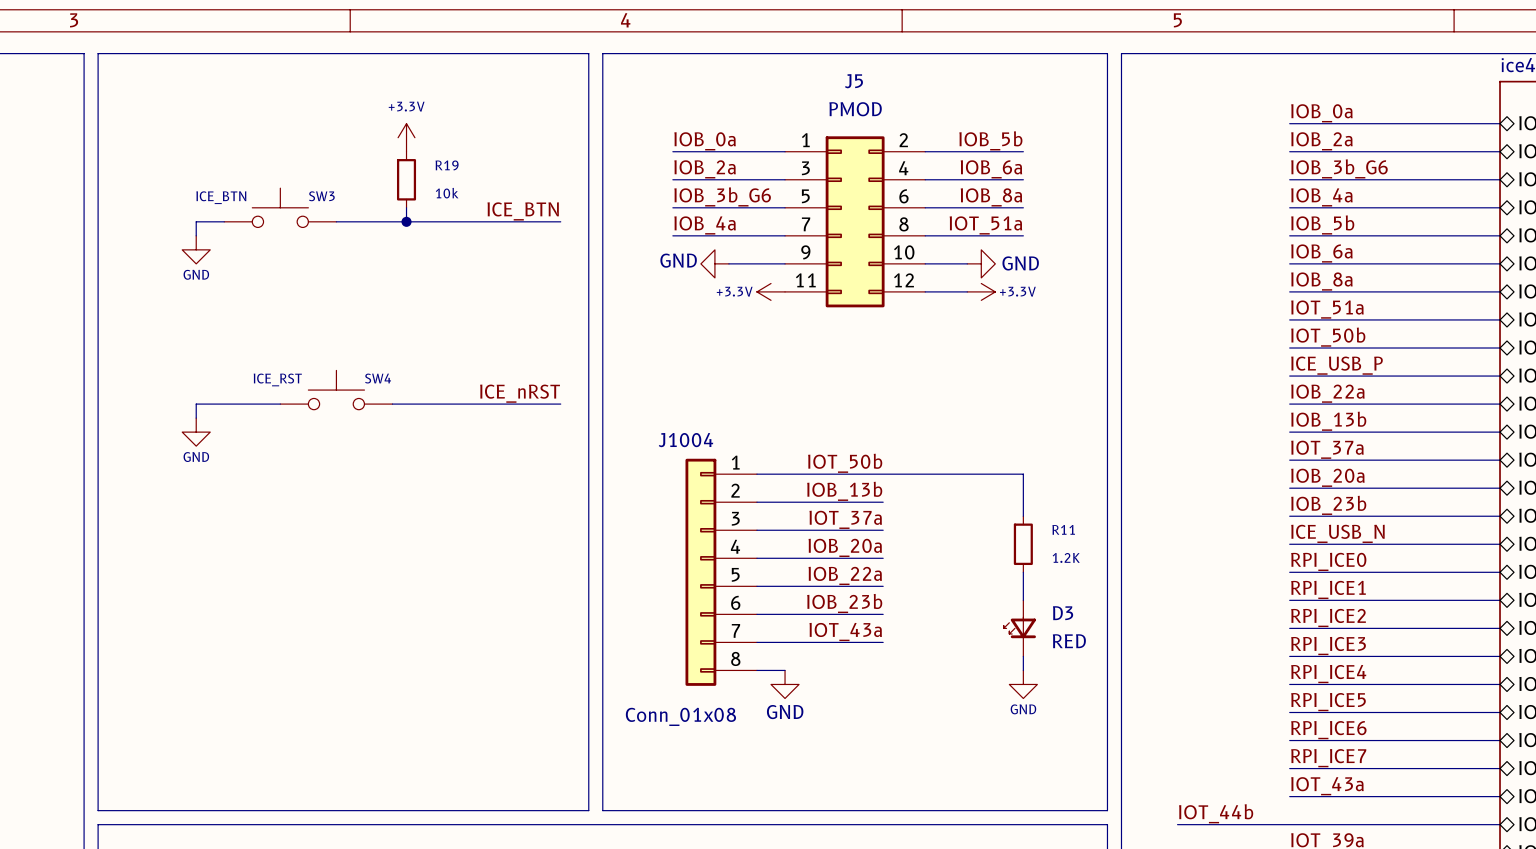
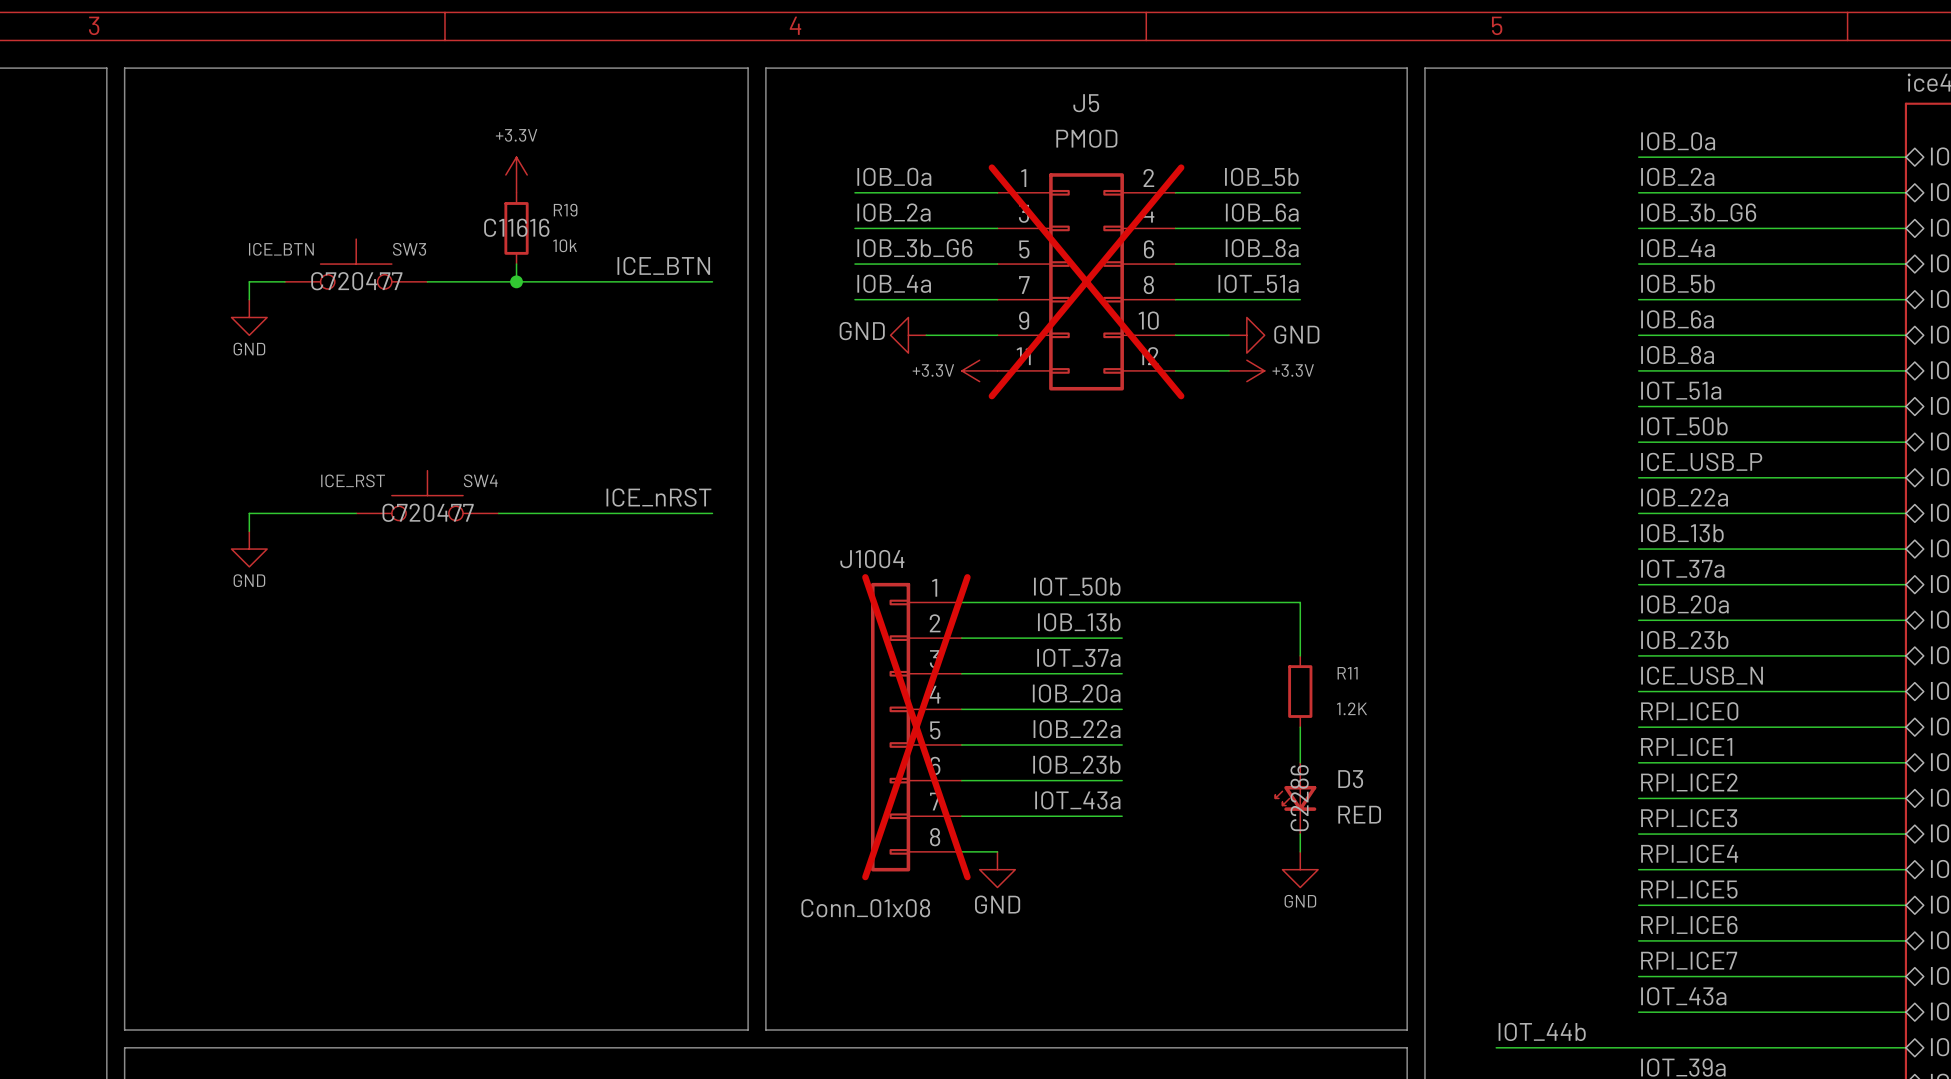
R19 text: none -> C11616 (516, 227)
SW3 text: none -> C720477 (356, 281)
J5 do-not-place cross: none -> (1086, 281)
SW4 text: none -> C720477 (428, 512)
J1004 do-not-place cross: none -> (916, 727)
D3 text: none -> C2286 (1299, 798)

